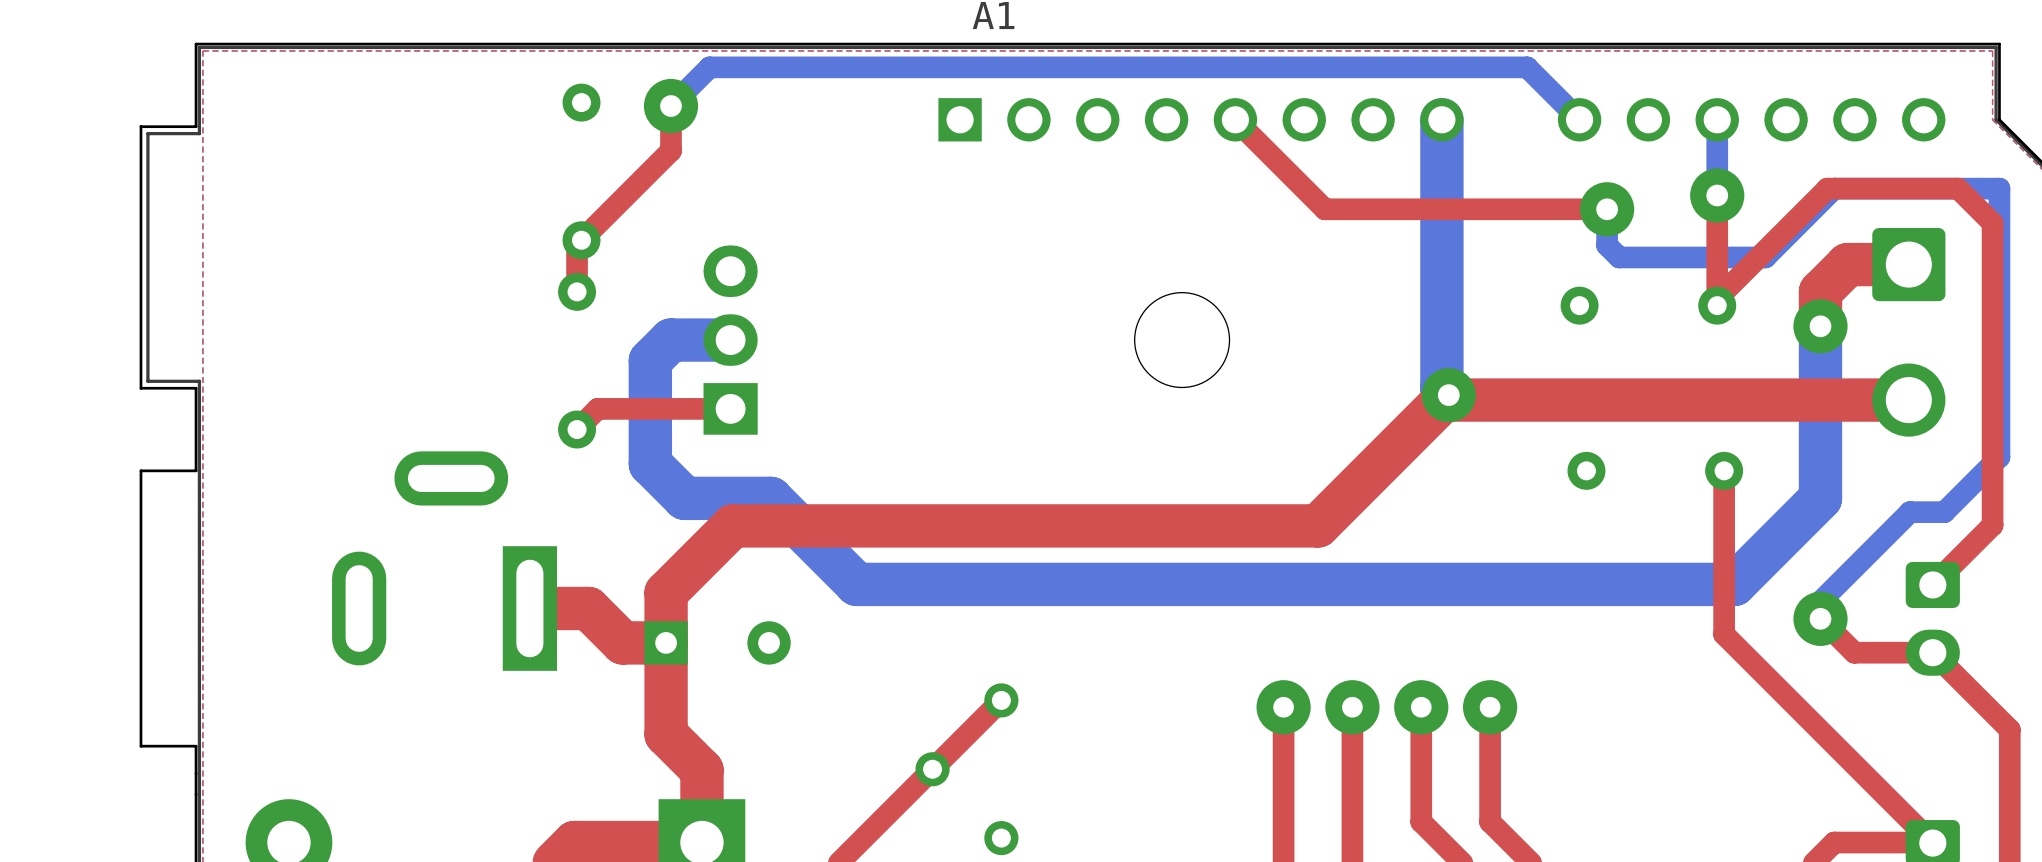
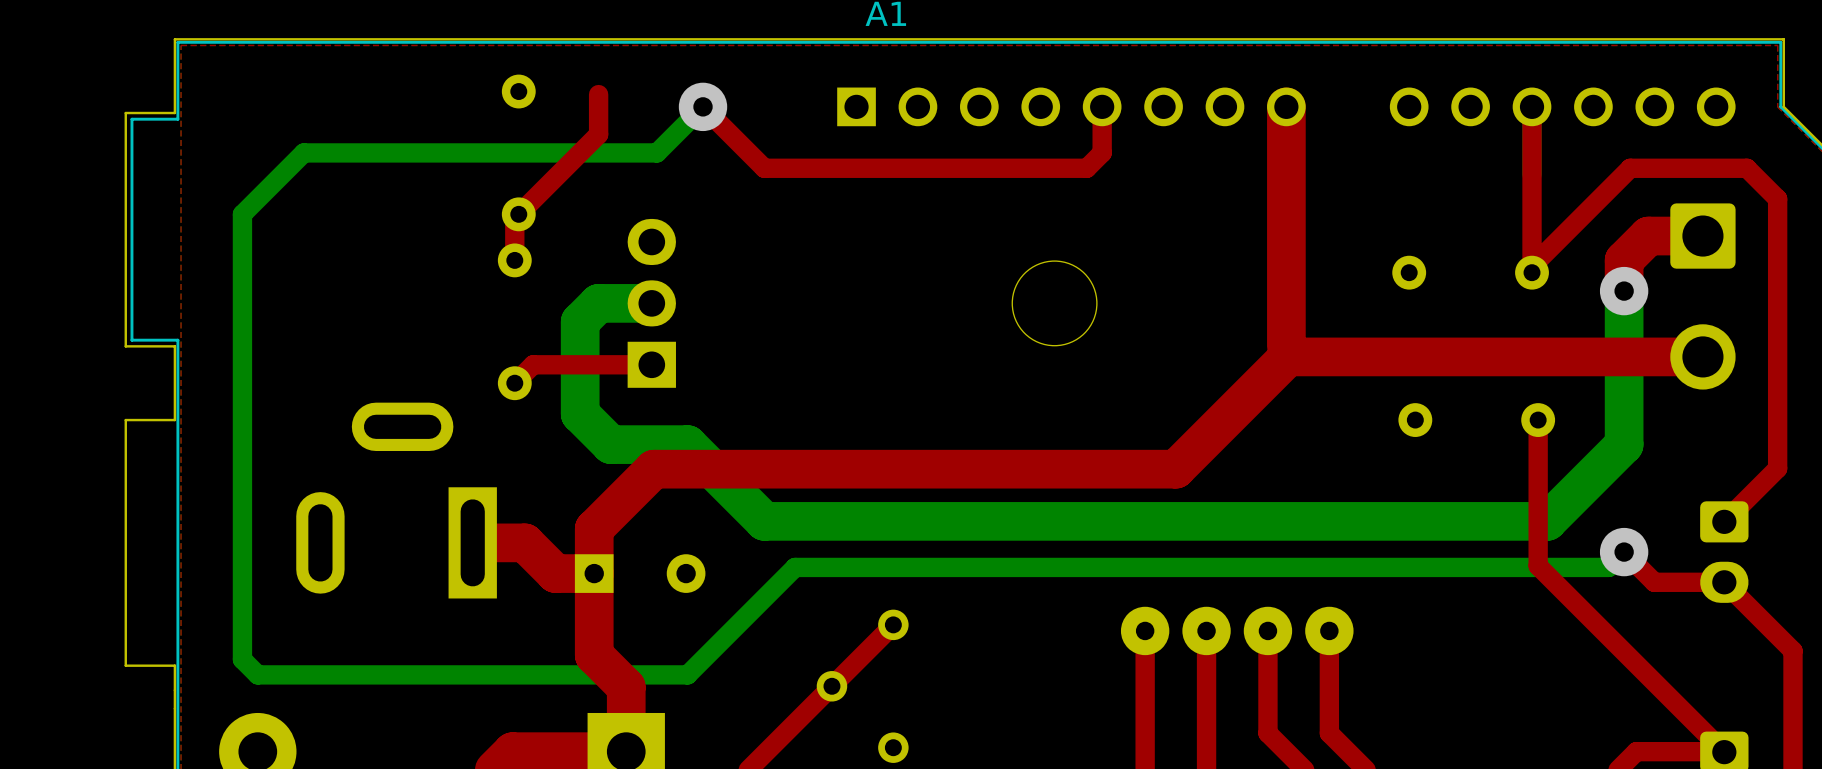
bottom track: (670, 106) (709, 67) (1527, 67) (1579, 119) -> none
via position: (670, 106) -> (703, 106)
top track: (1235, 119) (1324, 209) (1607, 209) -> (1102, 106) (1102, 152) (1086, 168) (764, 168) (703, 106)
top track: none -> (1286, 106) (1286, 346) (1292, 352)
bottom track: (1441, 119) (1441, 388) (1448, 395) -> none
top track: none -> (1532, 106) (1532, 174)
via: (1717, 195) -> none
bottom track: (1607, 209) (1607, 245) (1619, 257) (1765, 257) (1834, 188) (1999, 188) (1999, 457) (1944, 512) (1909, 512) (1820, 601) (1820, 618) -> (703, 106) (656, 152) (303, 152) (242, 214) (242, 659) (257, 674) (687, 674) (795, 567) (1608, 567) (1624, 552)
via: (1607, 209) -> none
via: (1448, 395) -> none

